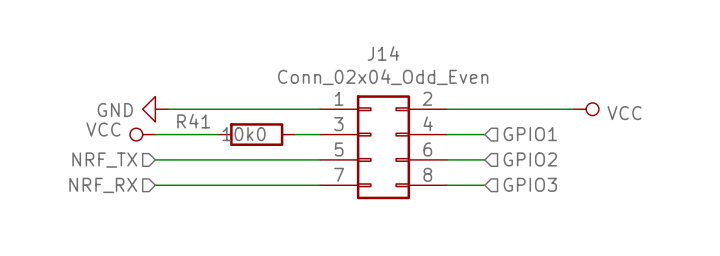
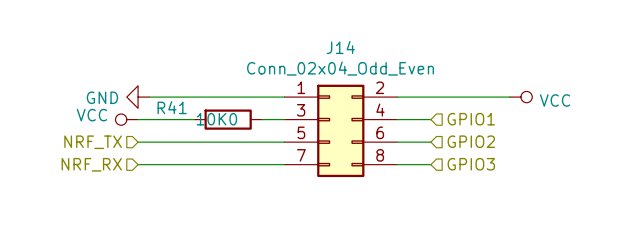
R41 value: 10k0 (244, 134) -> 10K0 (216, 119)

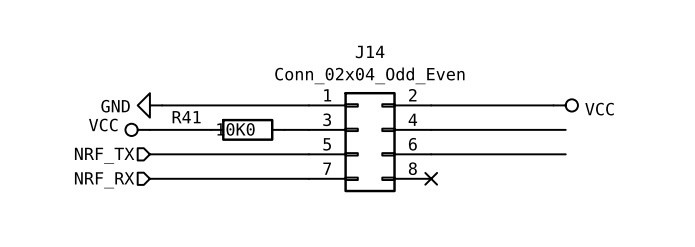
wire: none -> (467, 129) (565, 129)
hierarchical label: GPIO1 (471, 119) -> none
hierarchical label: GPIO2 (471, 141) -> none
wire: none -> (467, 154) (565, 154)
wire: (397, 164) (430, 164) -> none
no-connect mark: none -> (431, 178)
hierarchical label: GPIO3 (471, 164) -> none

